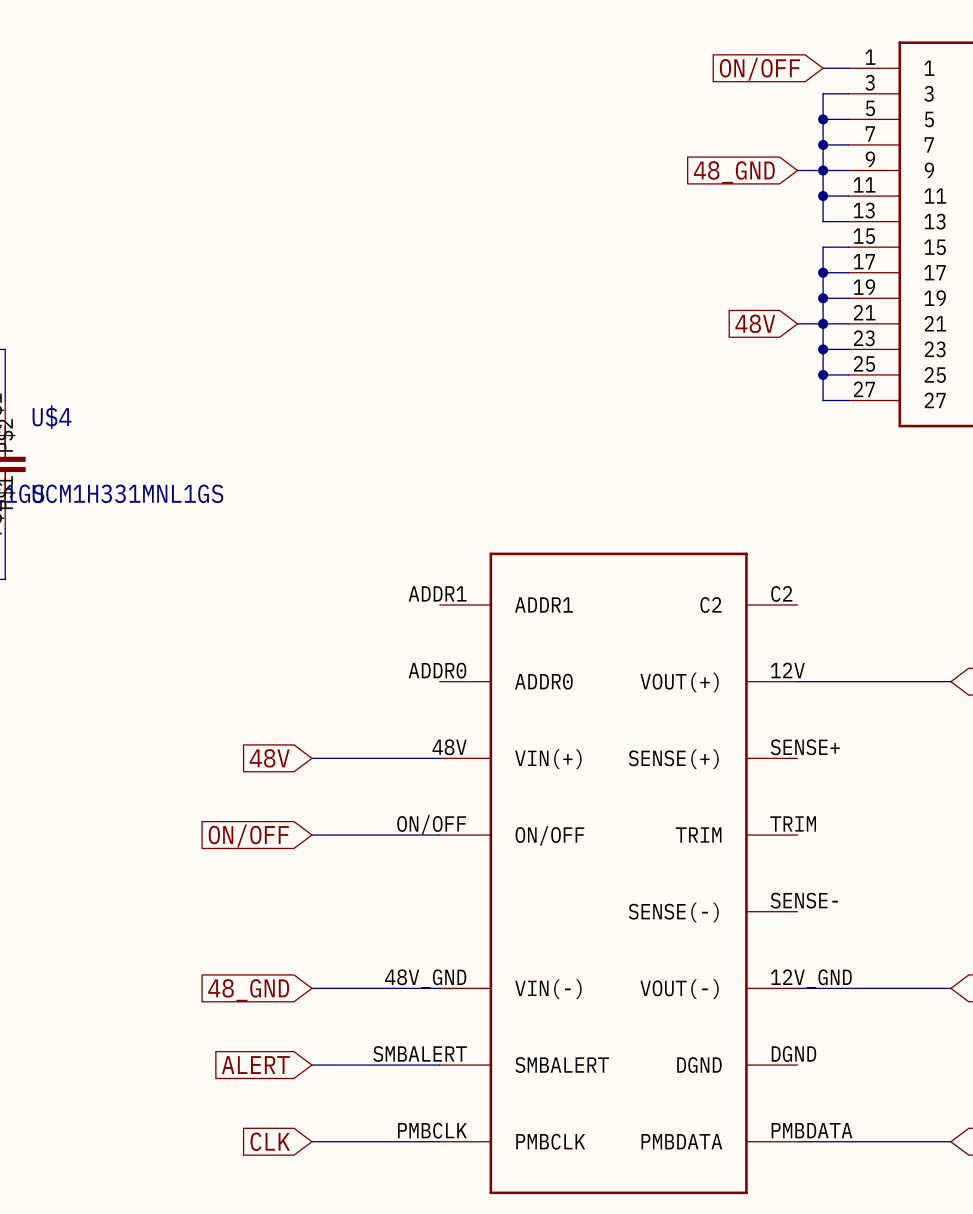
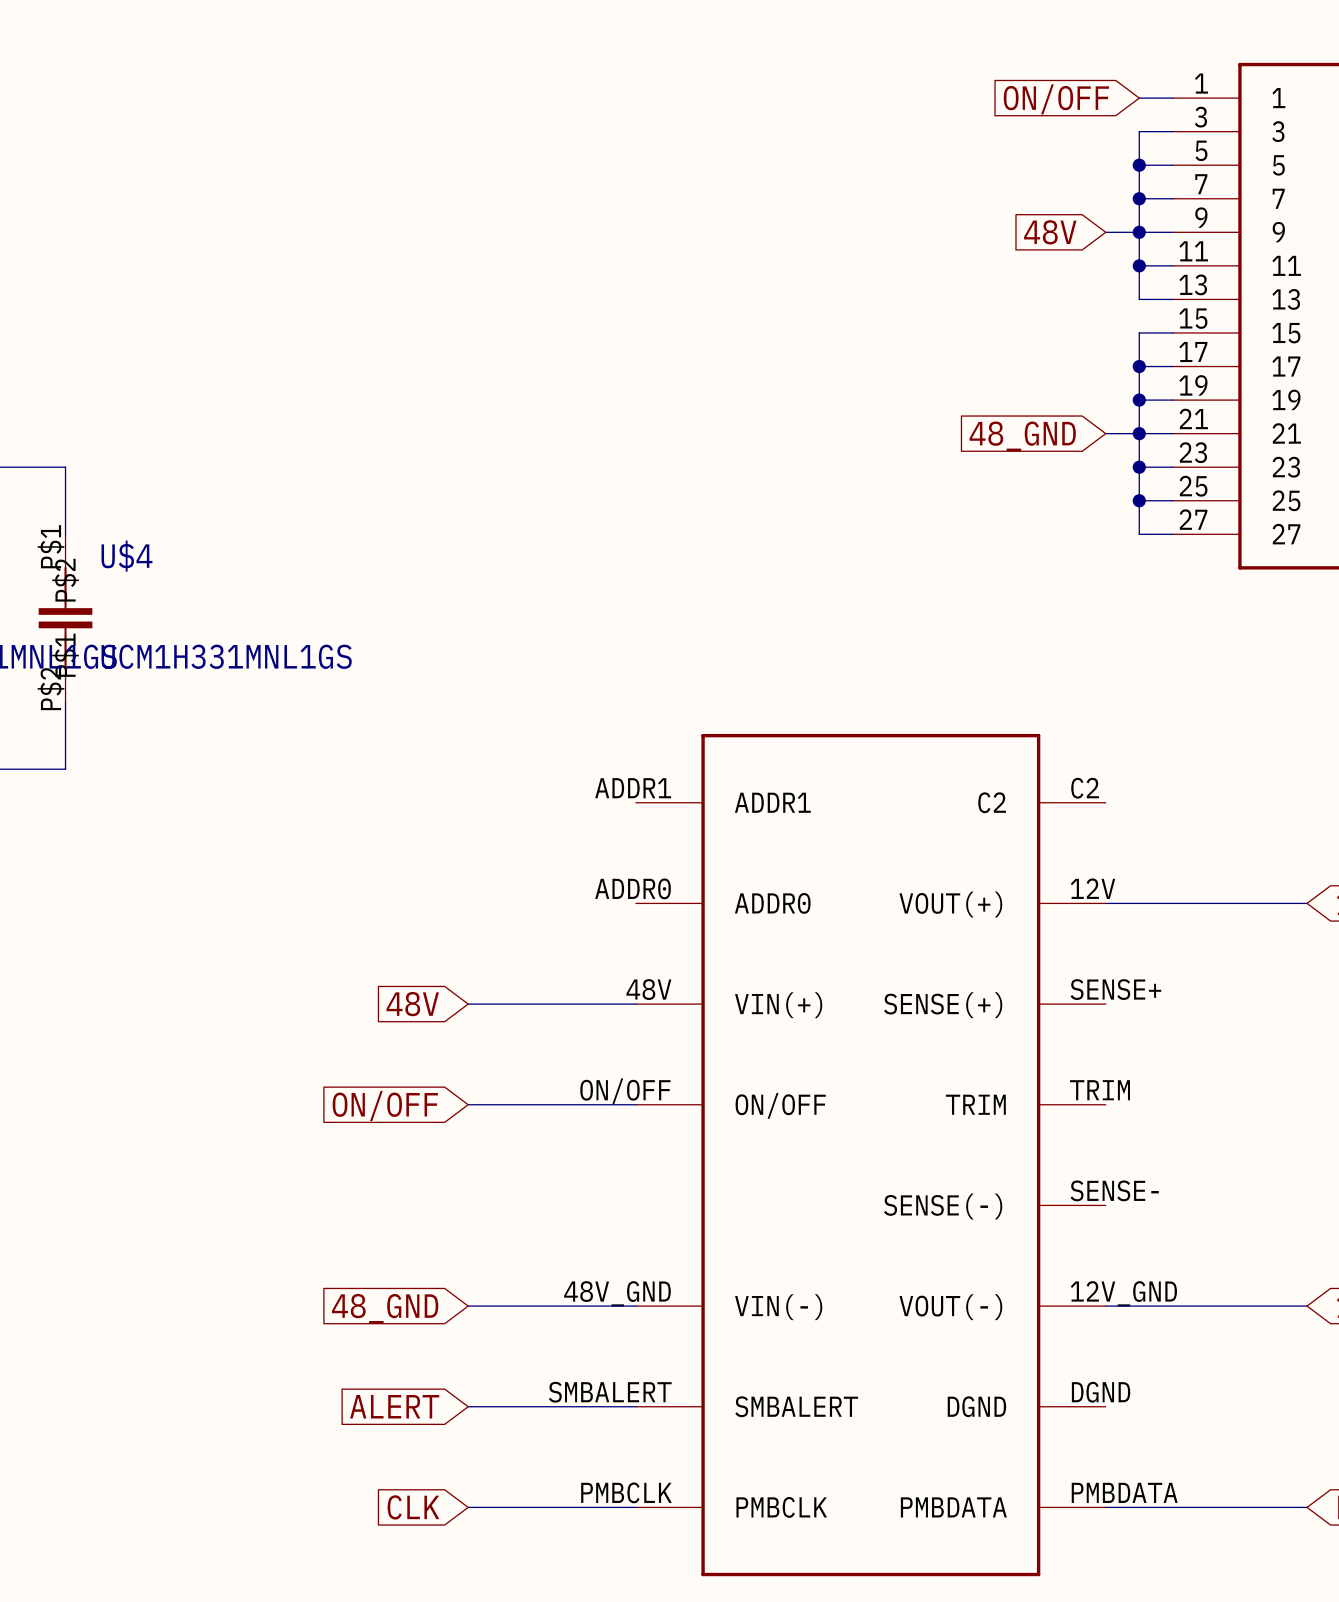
global label: 48_GND (734, 172) -> 48V (1050, 232)
global label: 48V (755, 323) -> 48_GND (1022, 436)

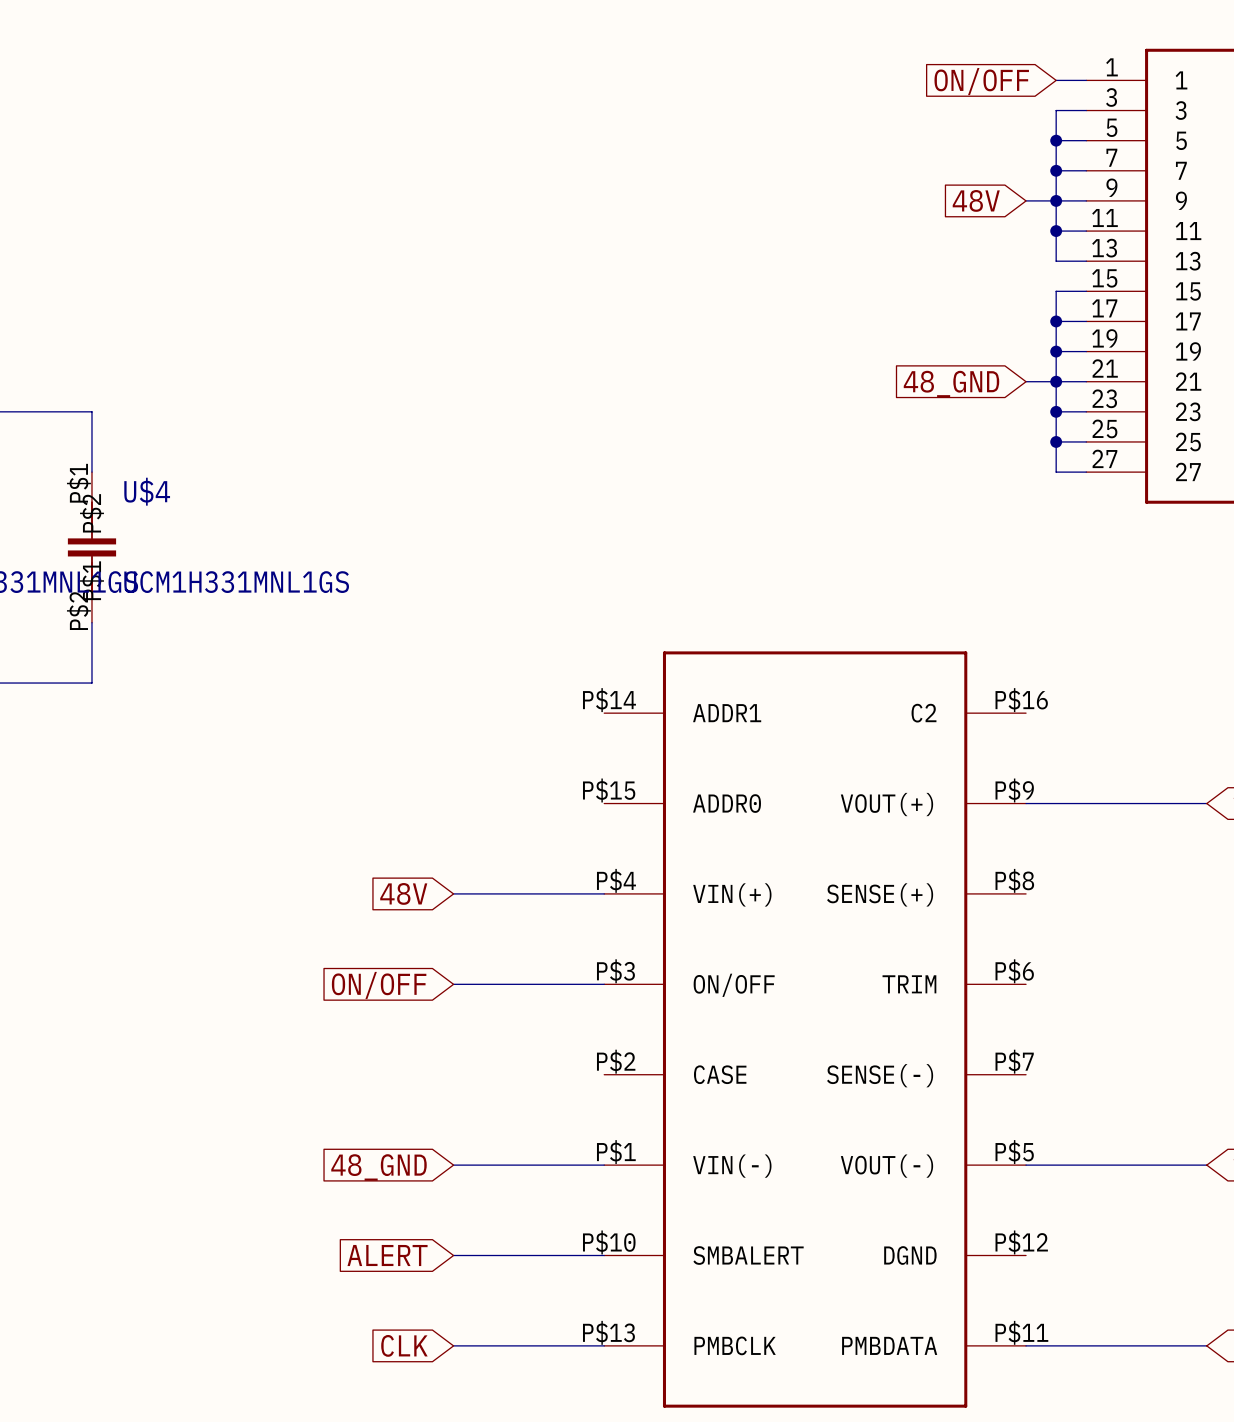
part symbol: [635, 733, 1106, 1577] -> [604, 651, 1027, 1408]

